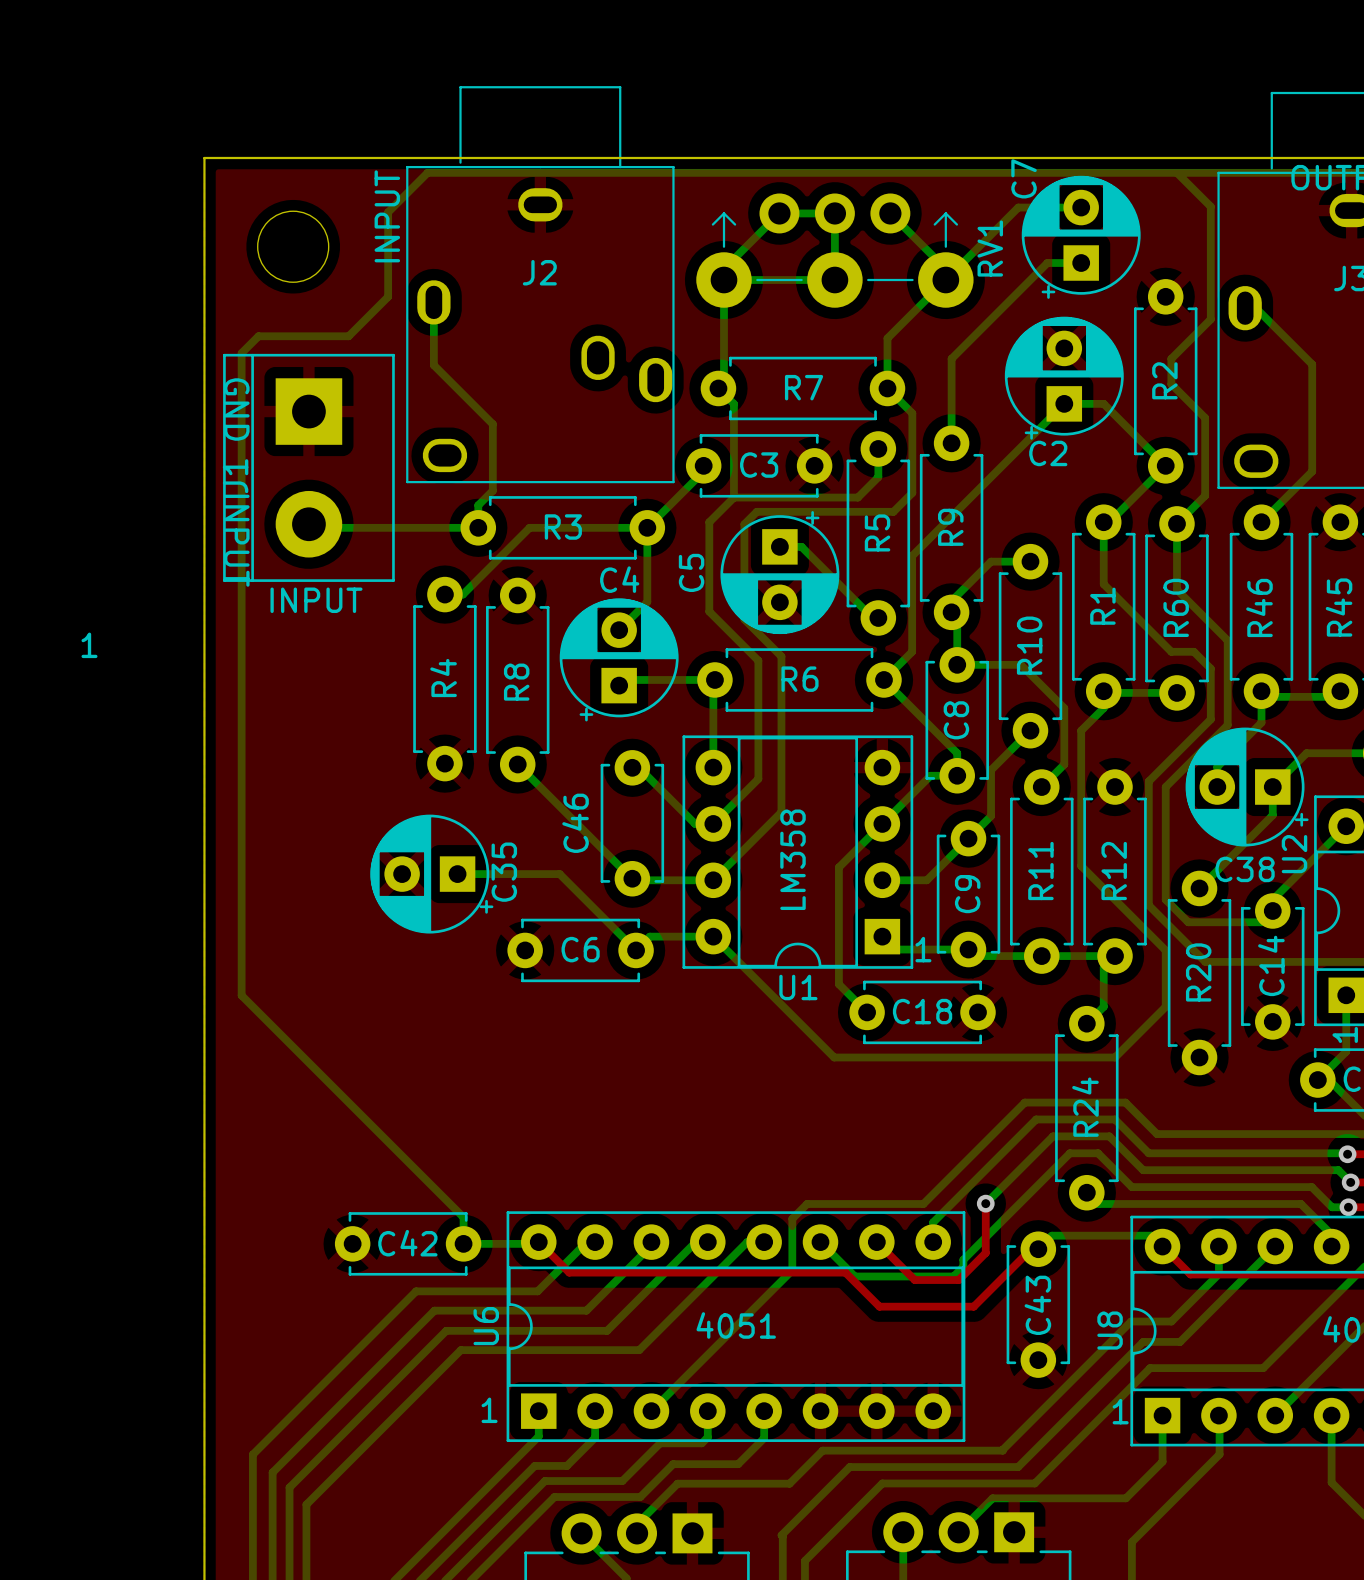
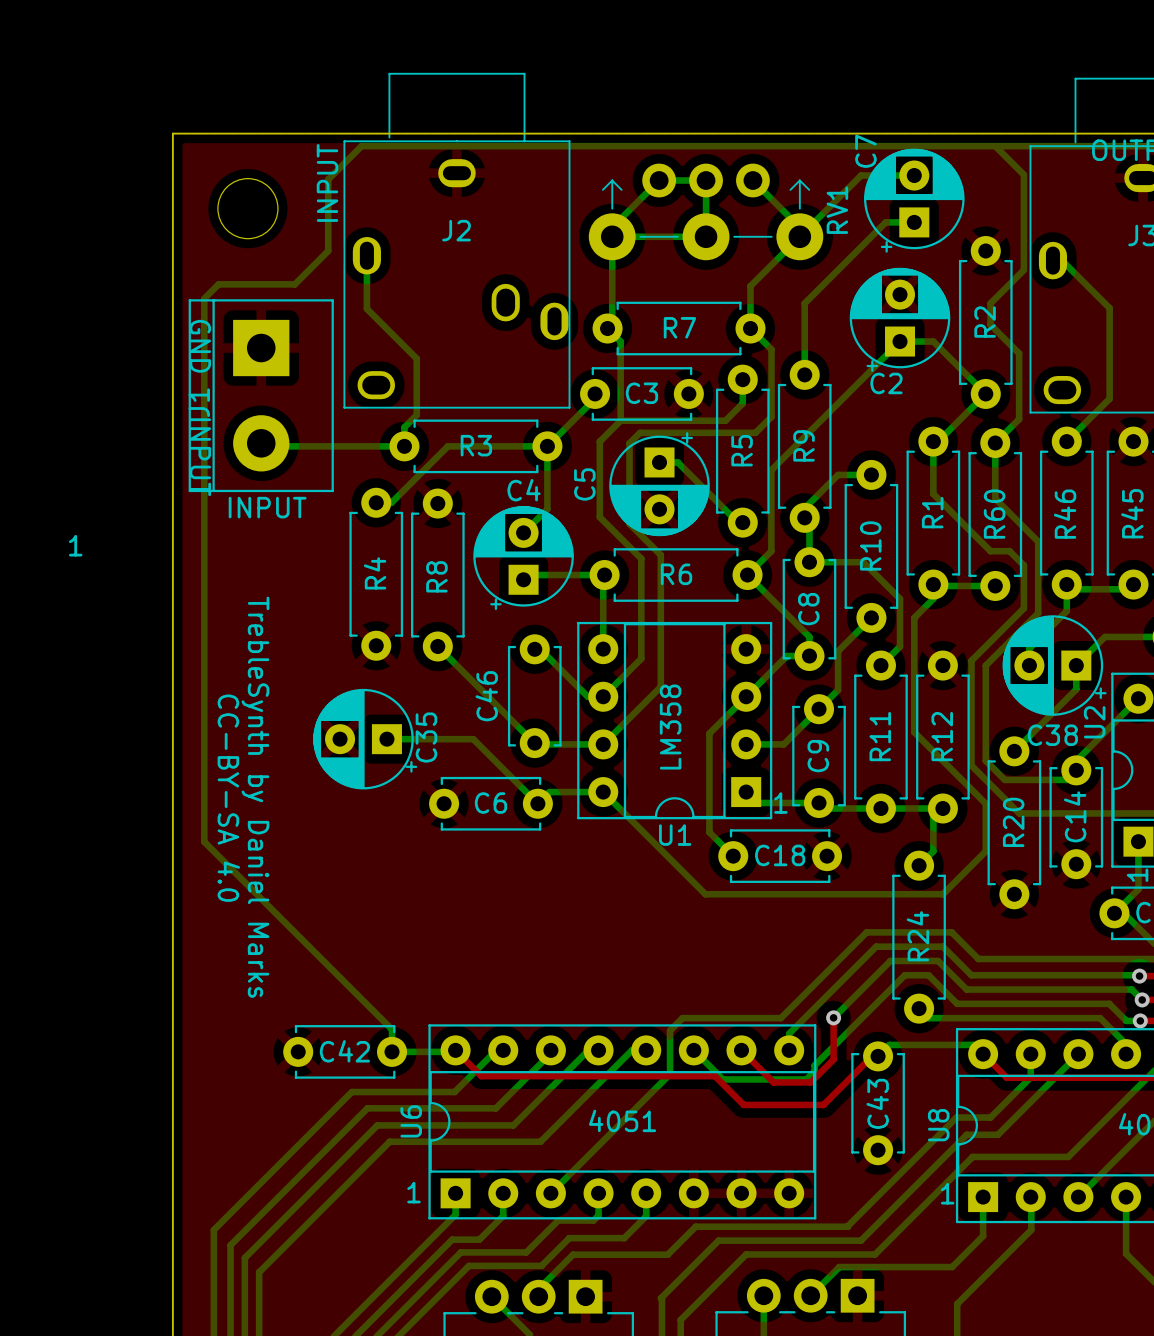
text: none -> TrebleSynth by Daniel Marks (255, 797)
text: none -> CC-BY-SA 4.0 (228, 798)

